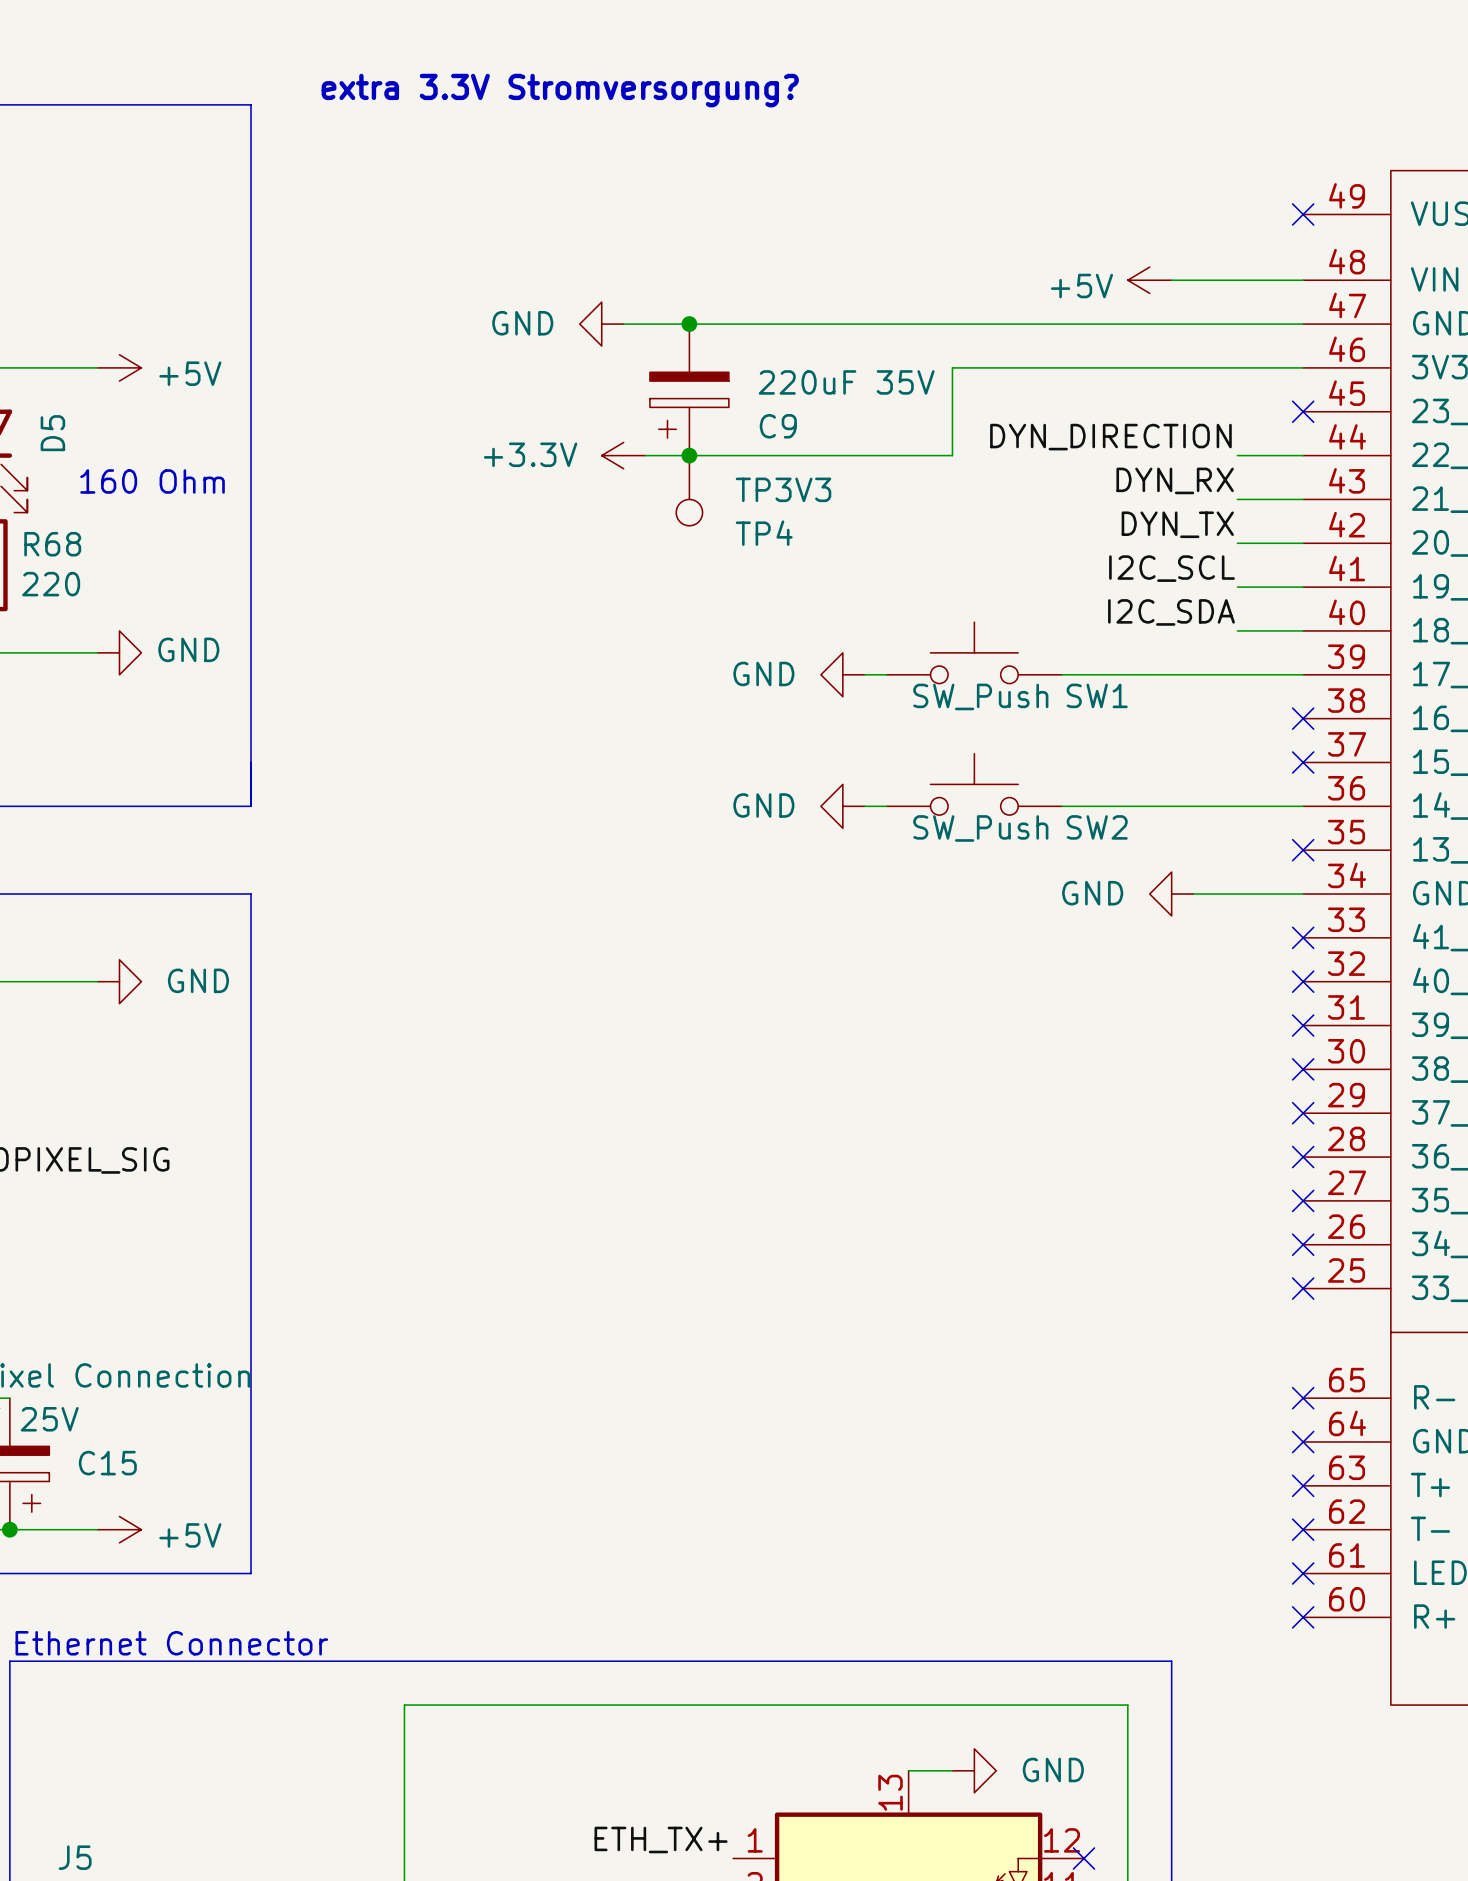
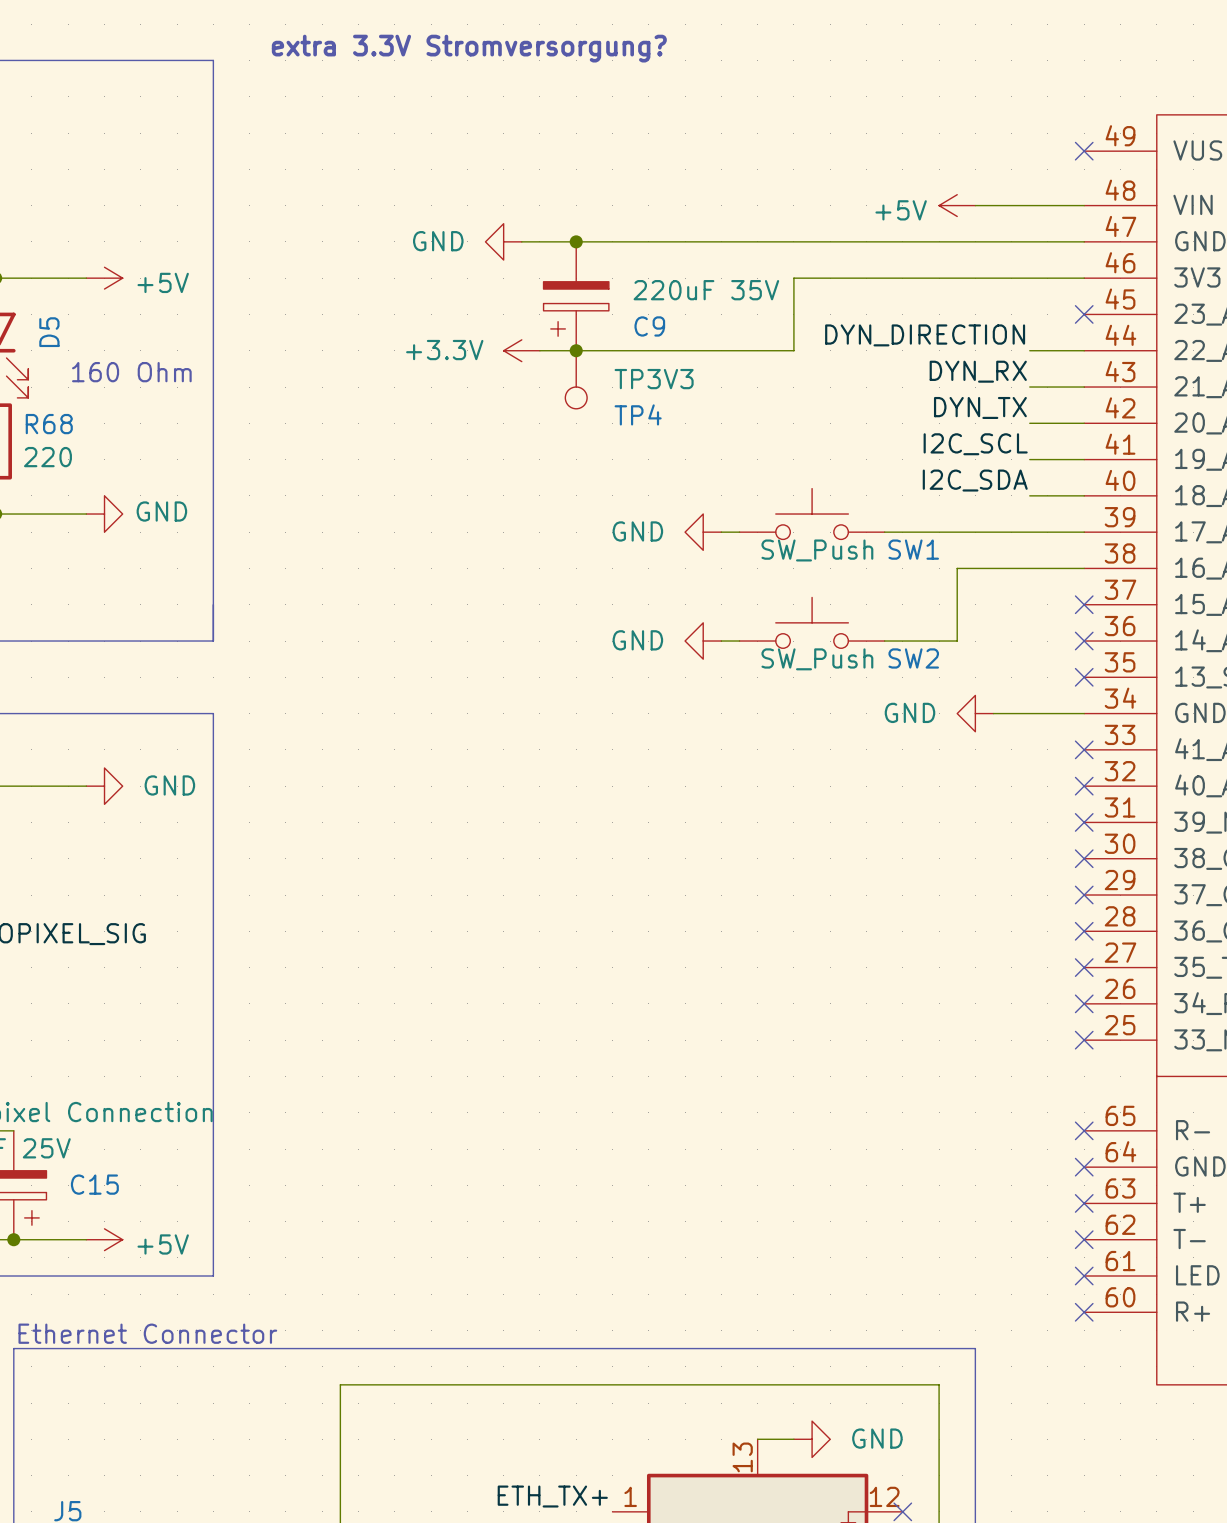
no-connect mark position: (1303, 718) -> (1084, 641)
wire: (1149, 806) (1303, 806) -> (957, 641) (957, 568) (1084, 568)

